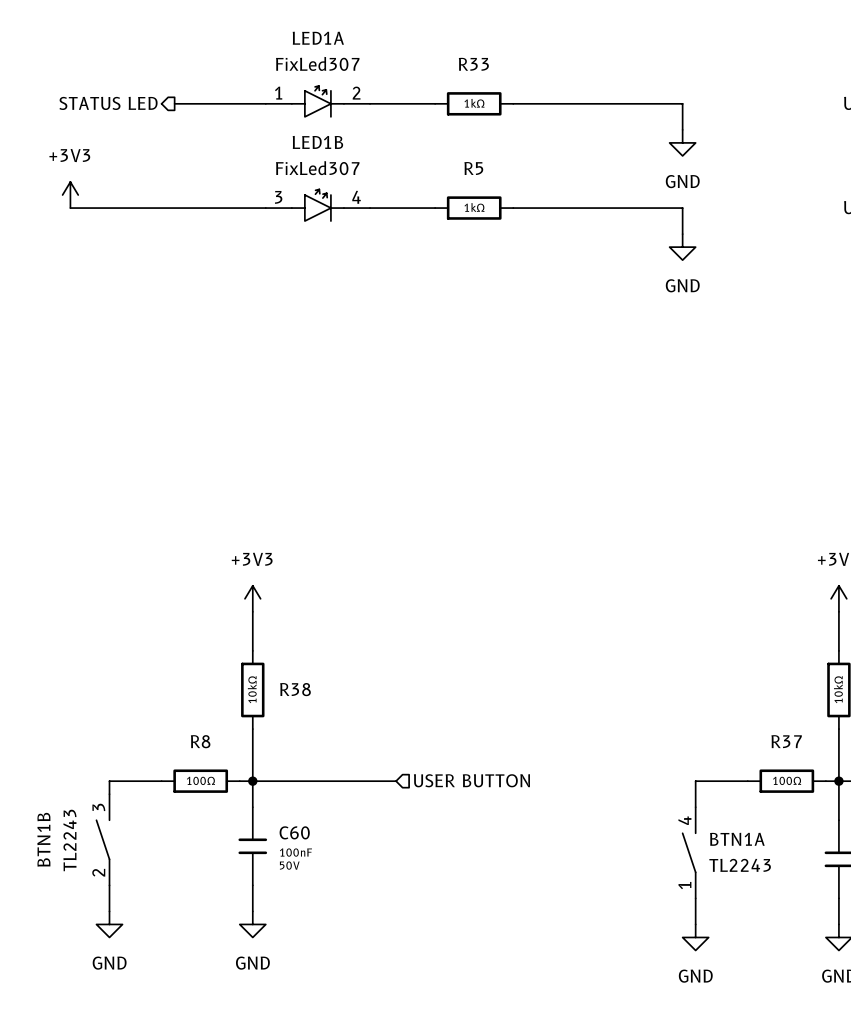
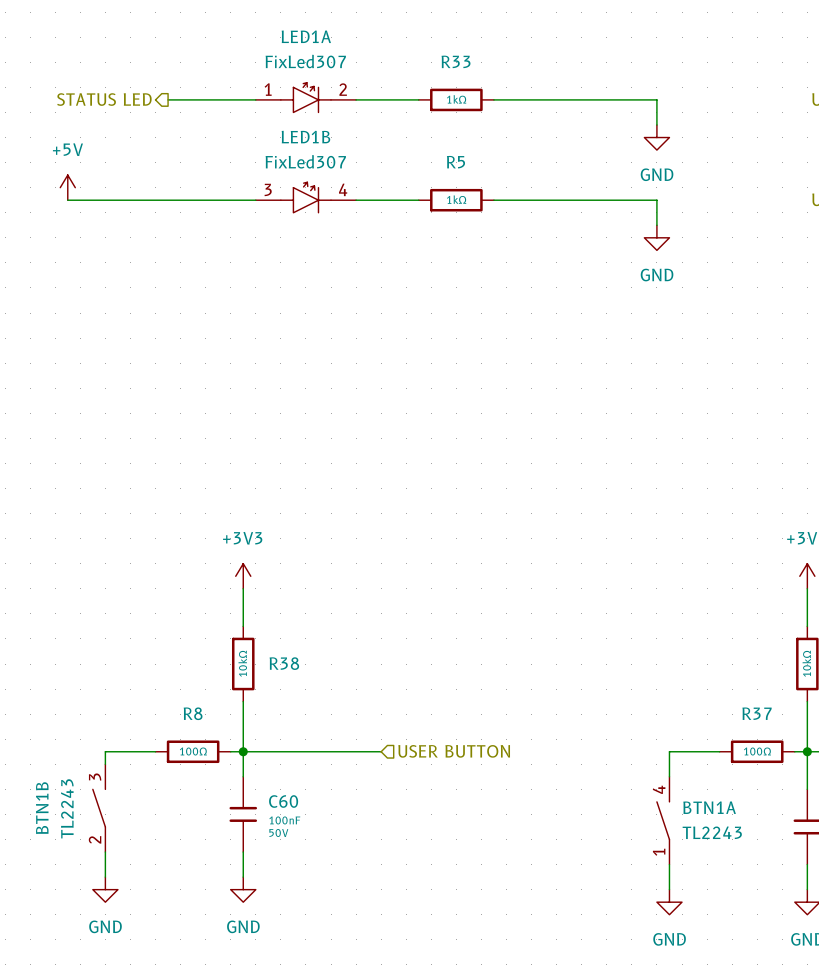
power symbol: +3V3 (70, 195) -> +5V (67, 187)

